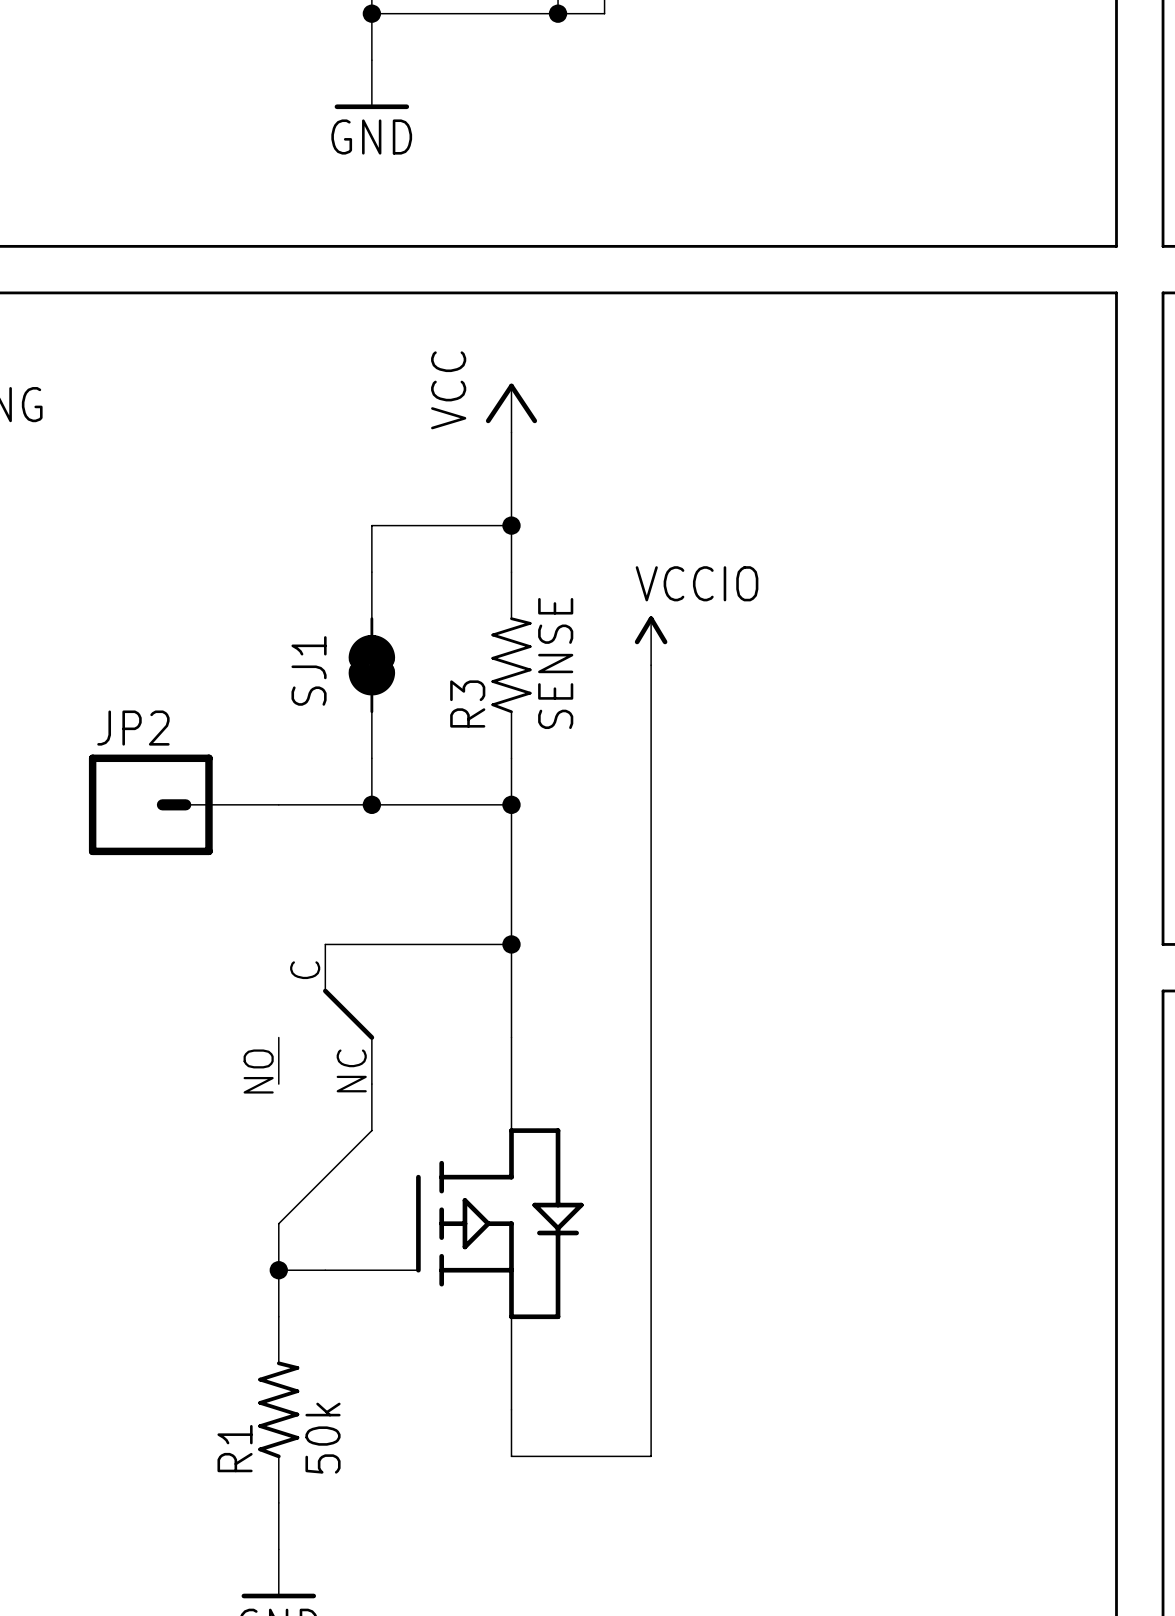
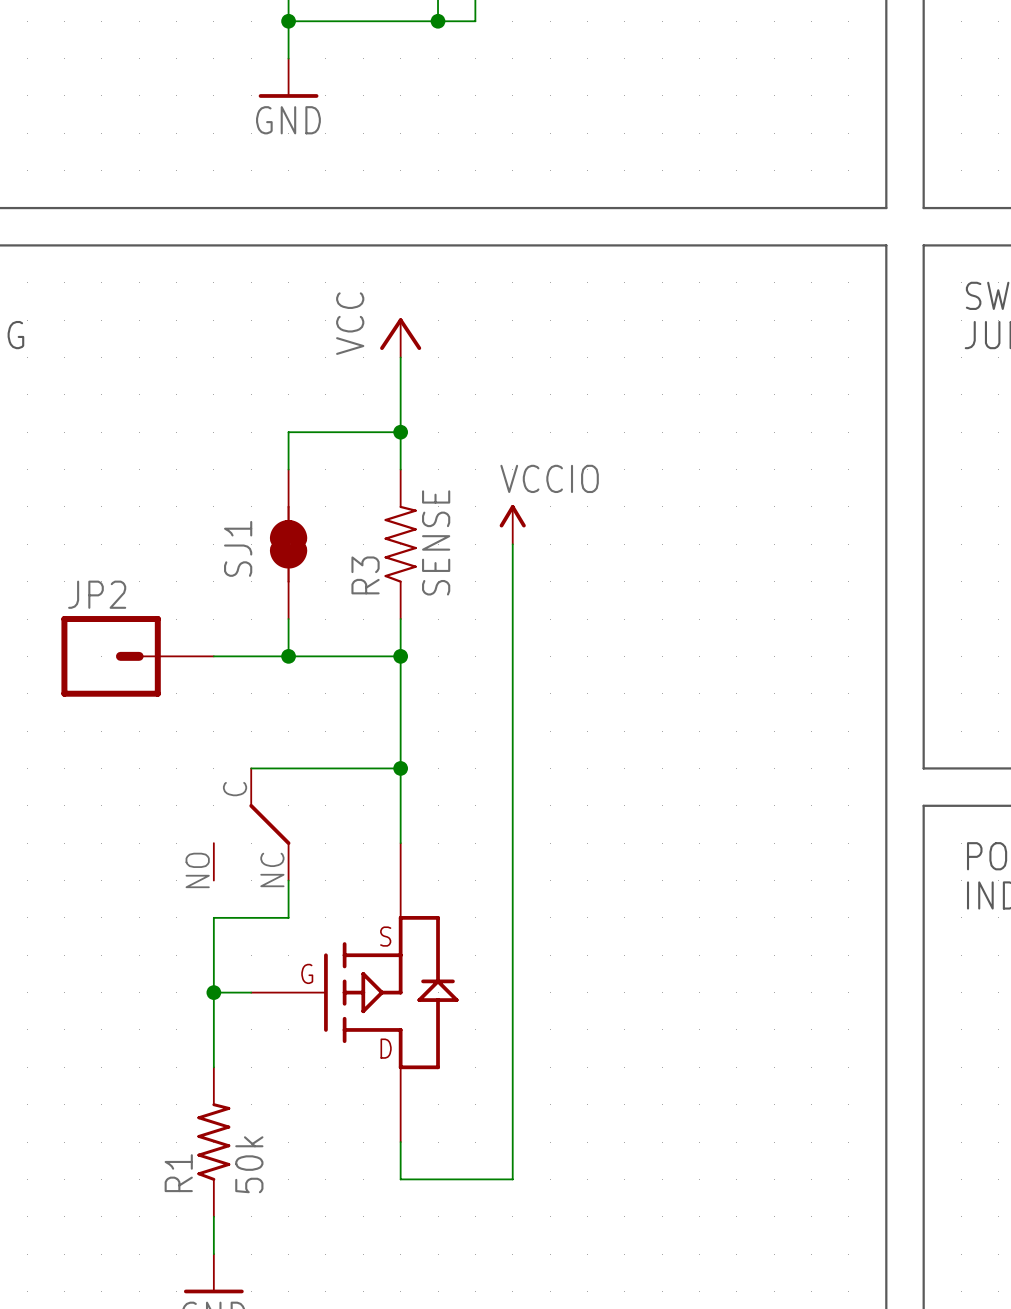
part symbol: [325, 1037, 584, 1410] -> [251, 843, 459, 1143]
wire: (371, 1130) (278, 1223) -> (288, 917) (213, 917) (213, 992) (251, 992)
wire: (278, 1270) (325, 1270) -> none
junction position: (278, 1270) -> (213, 992)

